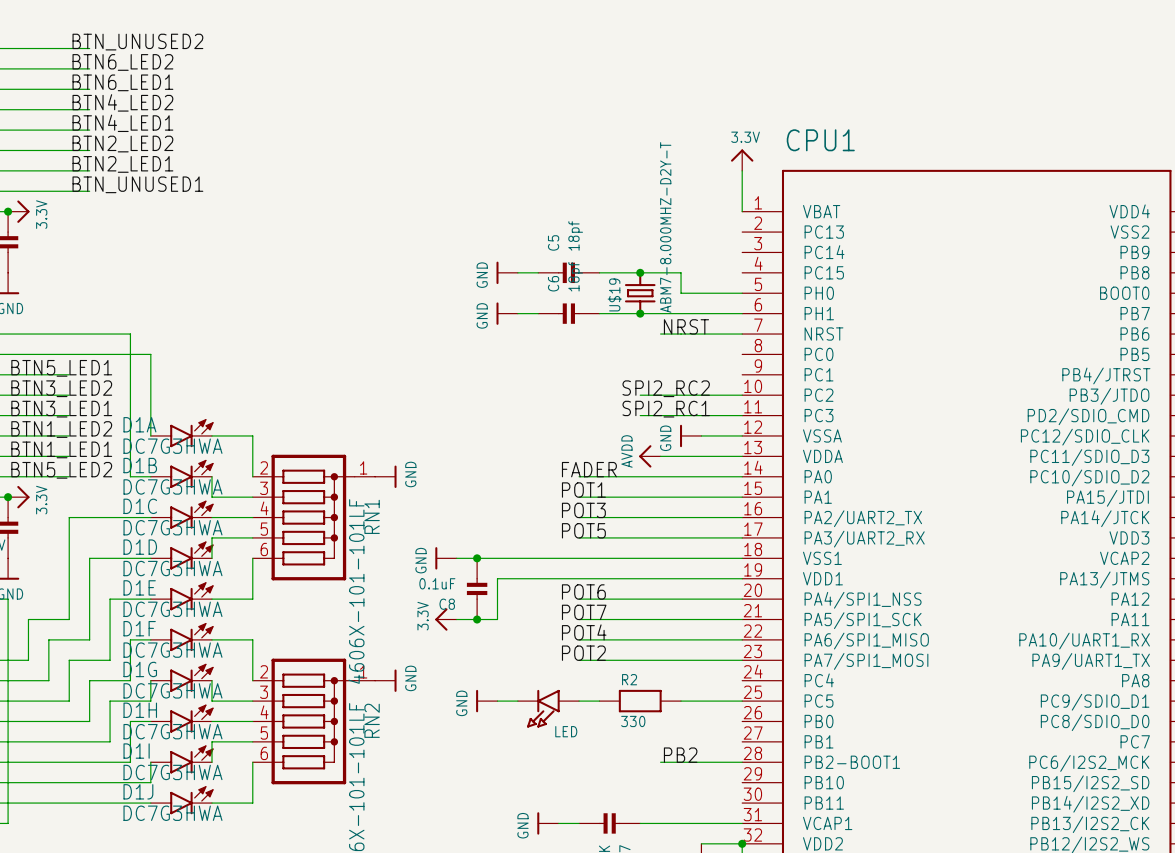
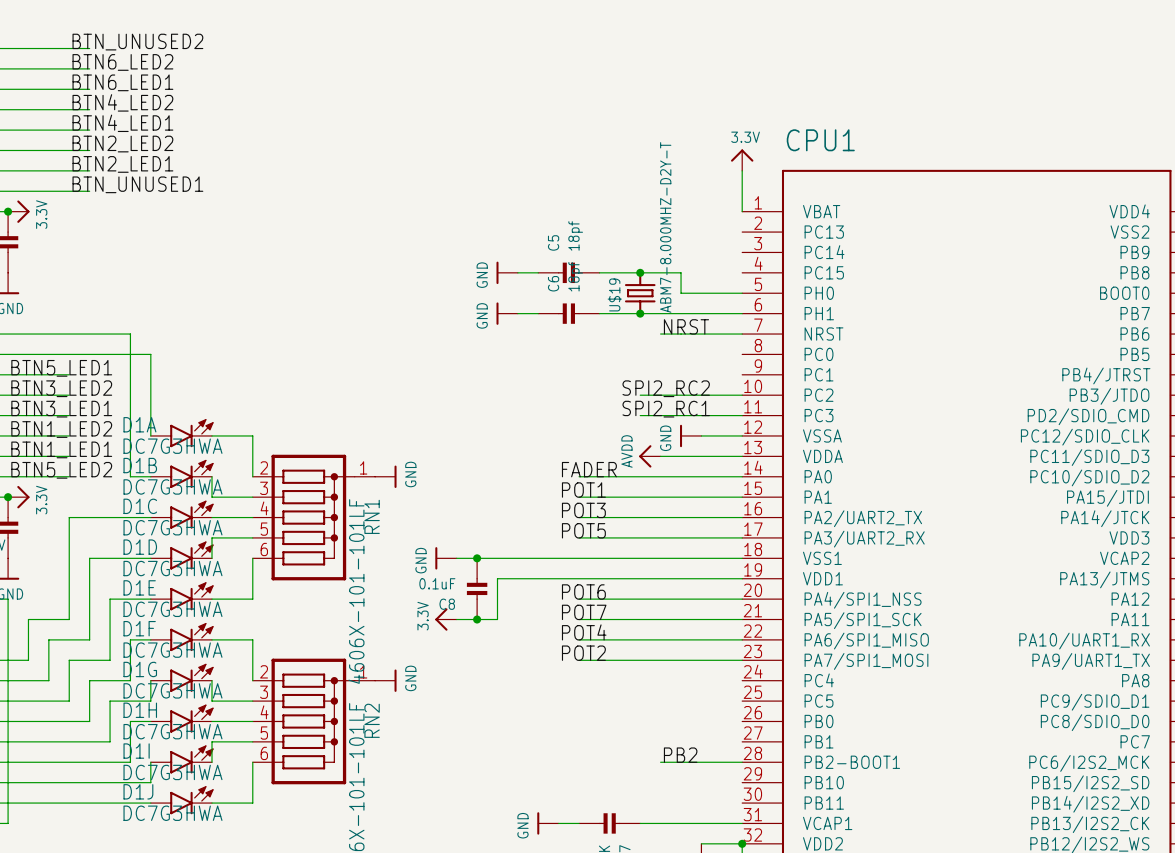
power symbol: GND (486, 701) -> none
wire: (497, 701) (517, 701) -> none
wire: (579, 701) (599, 701) -> none
R2: 330 (640, 701) -> none
wire: (681, 701) (742, 701) -> none
LED: (548, 708) -> none

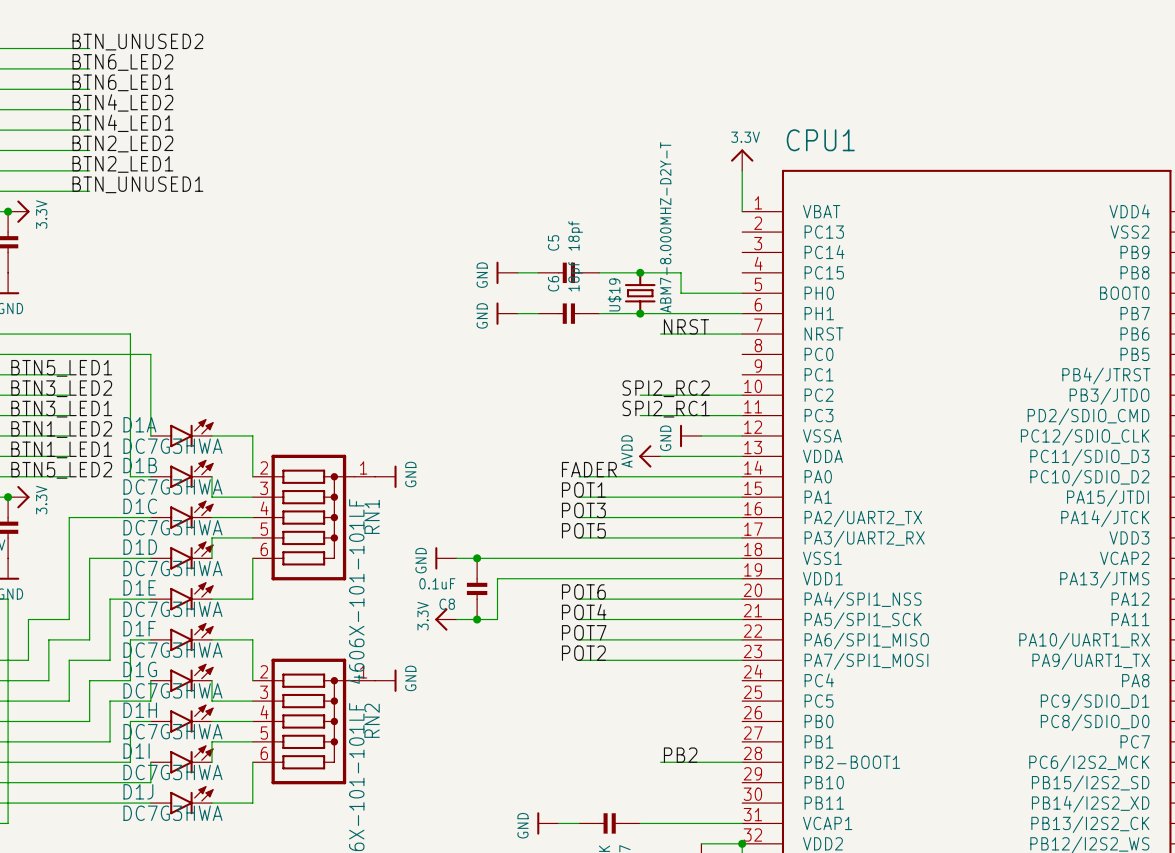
label: POT7 (584, 612) -> POT4 (584, 612)
label: POT4 (584, 632) -> POT7 (584, 632)

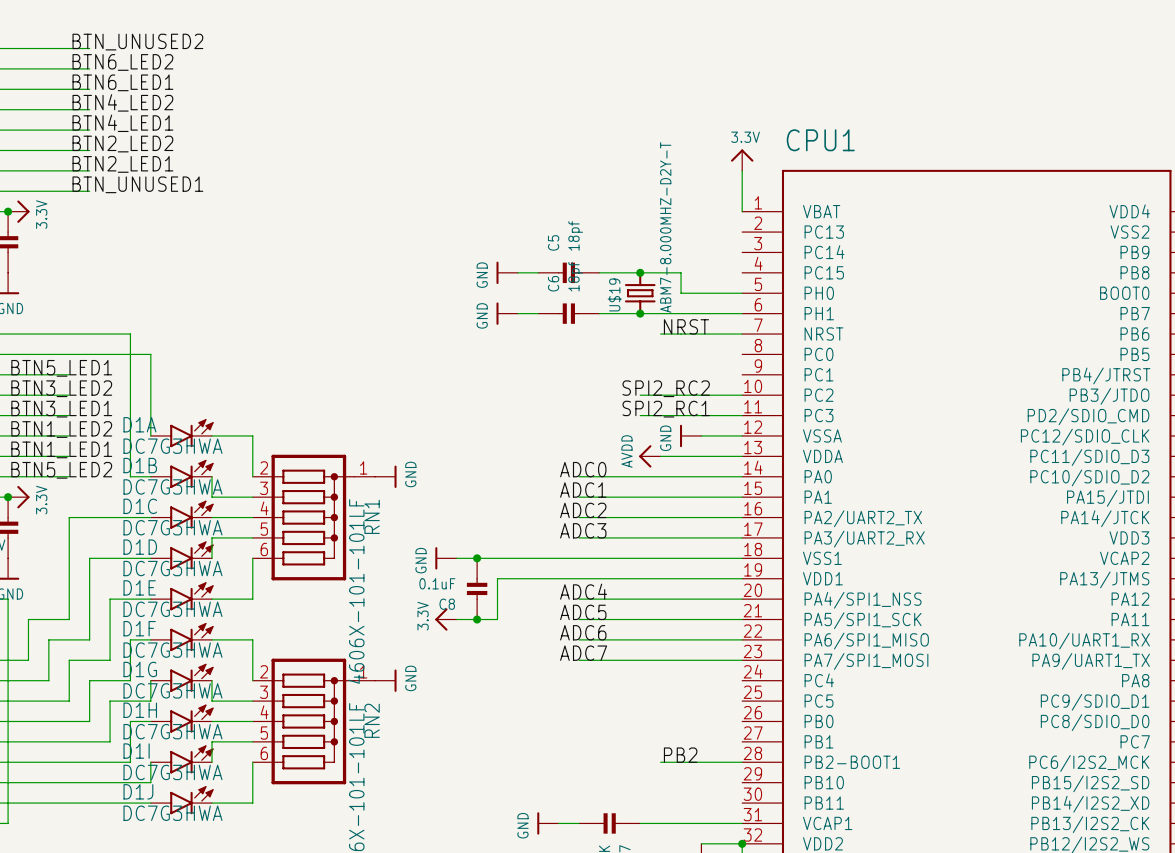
label: FADER (589, 469) -> ADC0 (583, 469)
label: POT1 (583, 490) -> ADC1 (583, 490)
label: POT3 (583, 510) -> ADC2 (583, 510)
label: POT5 (583, 530) -> ADC3 (583, 530)
label: POT6 (583, 591) -> ADC4 (583, 591)
label: POT4 (584, 612) -> ADC5 (583, 612)
label: POT7 (584, 632) -> ADC6 (583, 632)
label: POT2 (583, 653) -> ADC7 (583, 653)

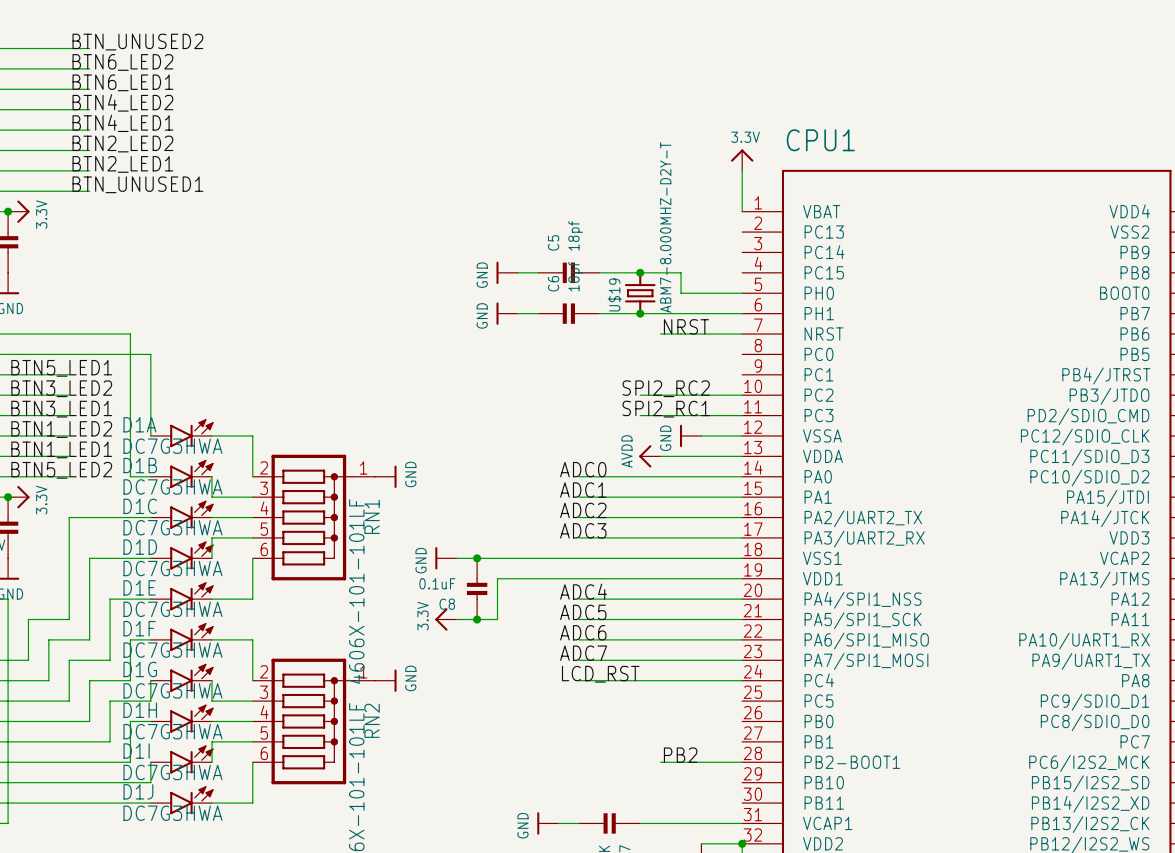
label: none -> LCD_RST (600, 674)
wire: none -> (579, 680) (742, 680)

